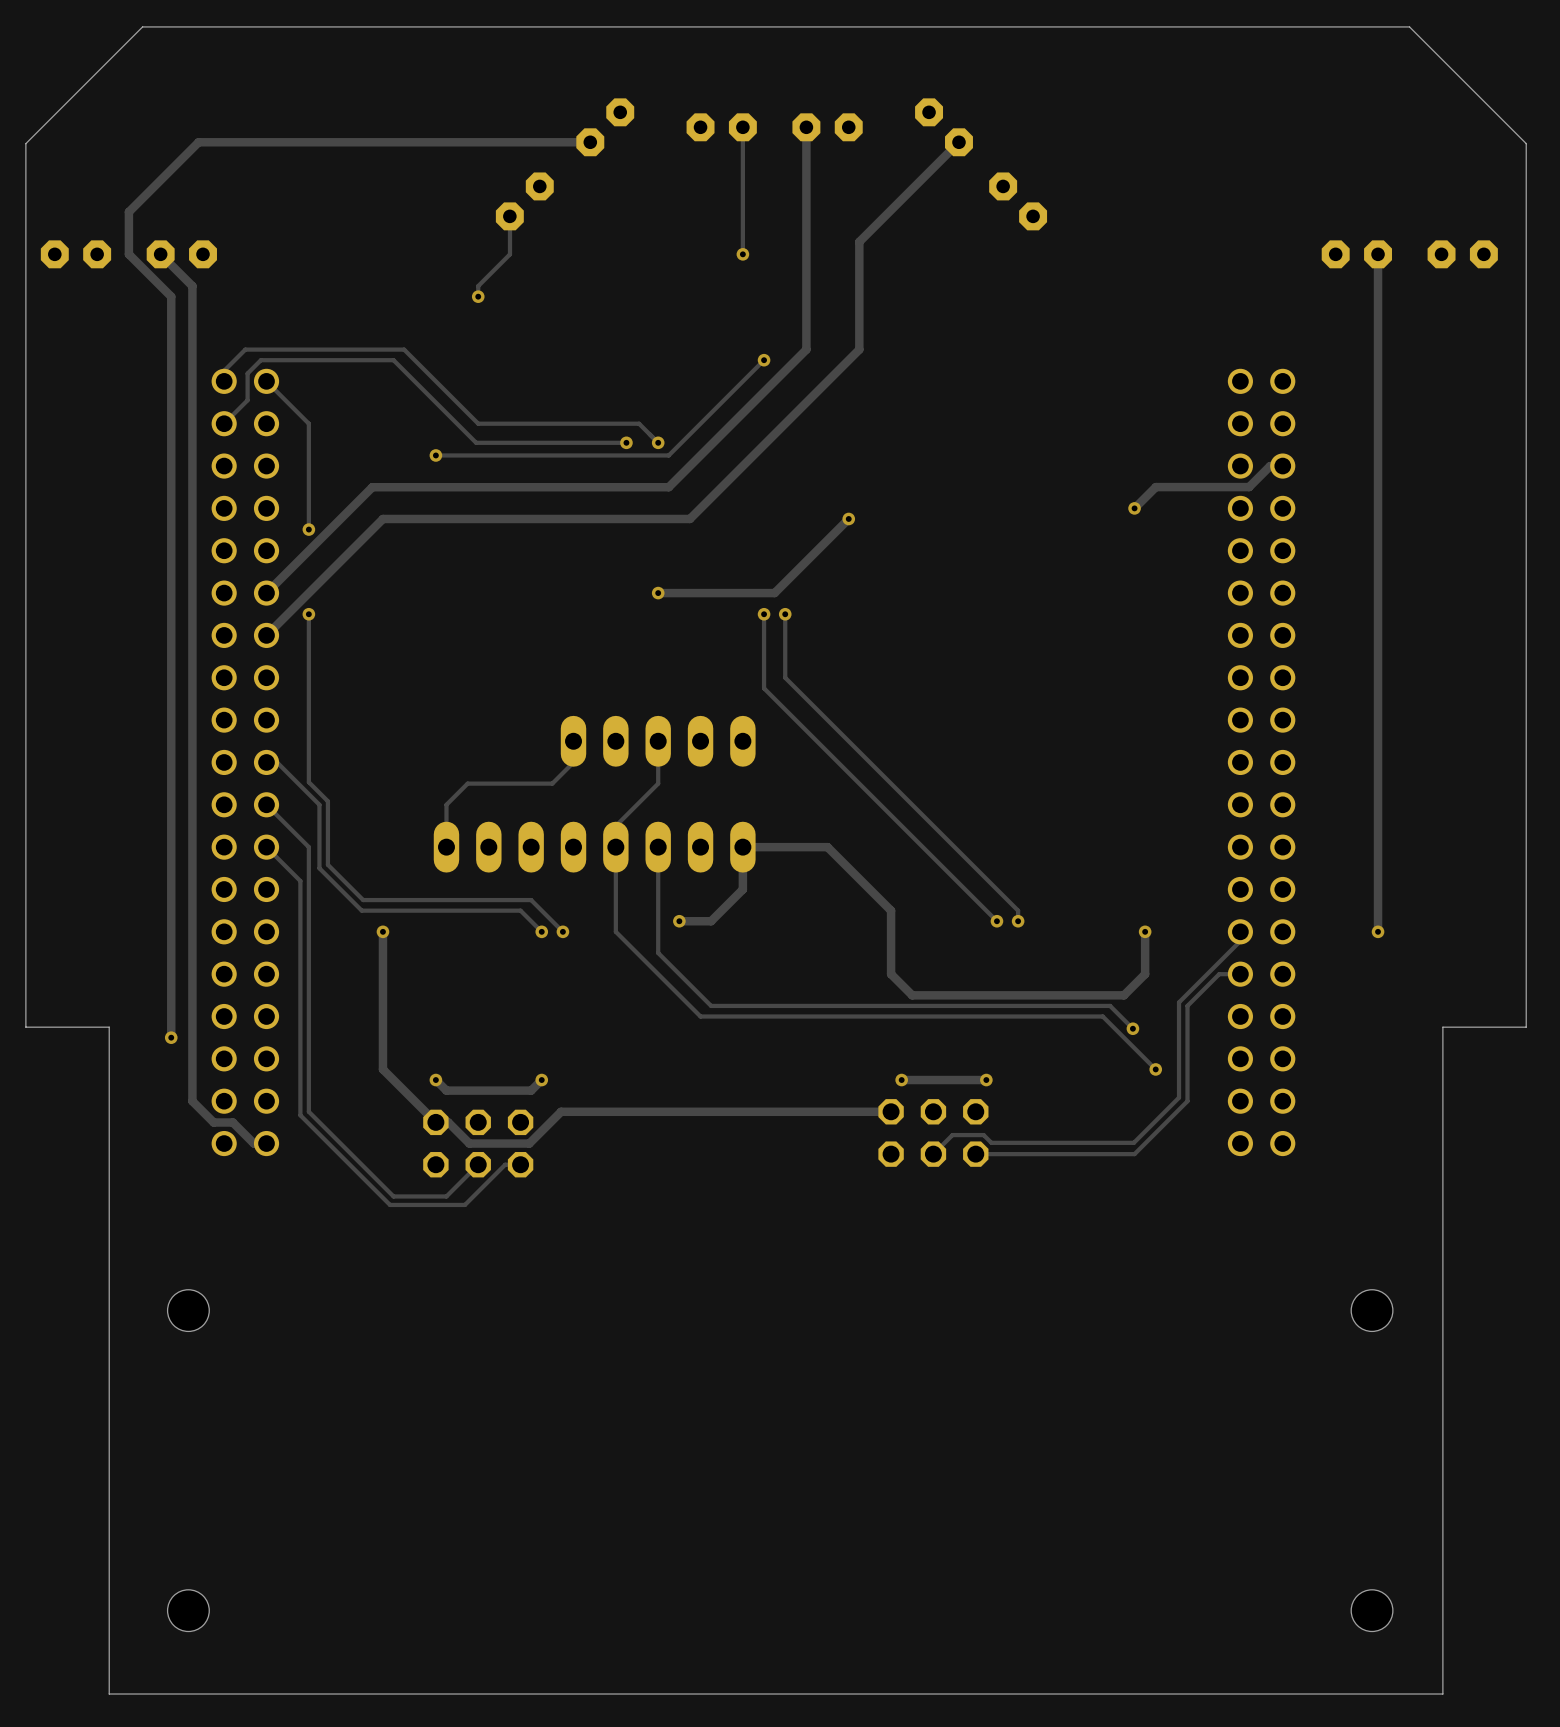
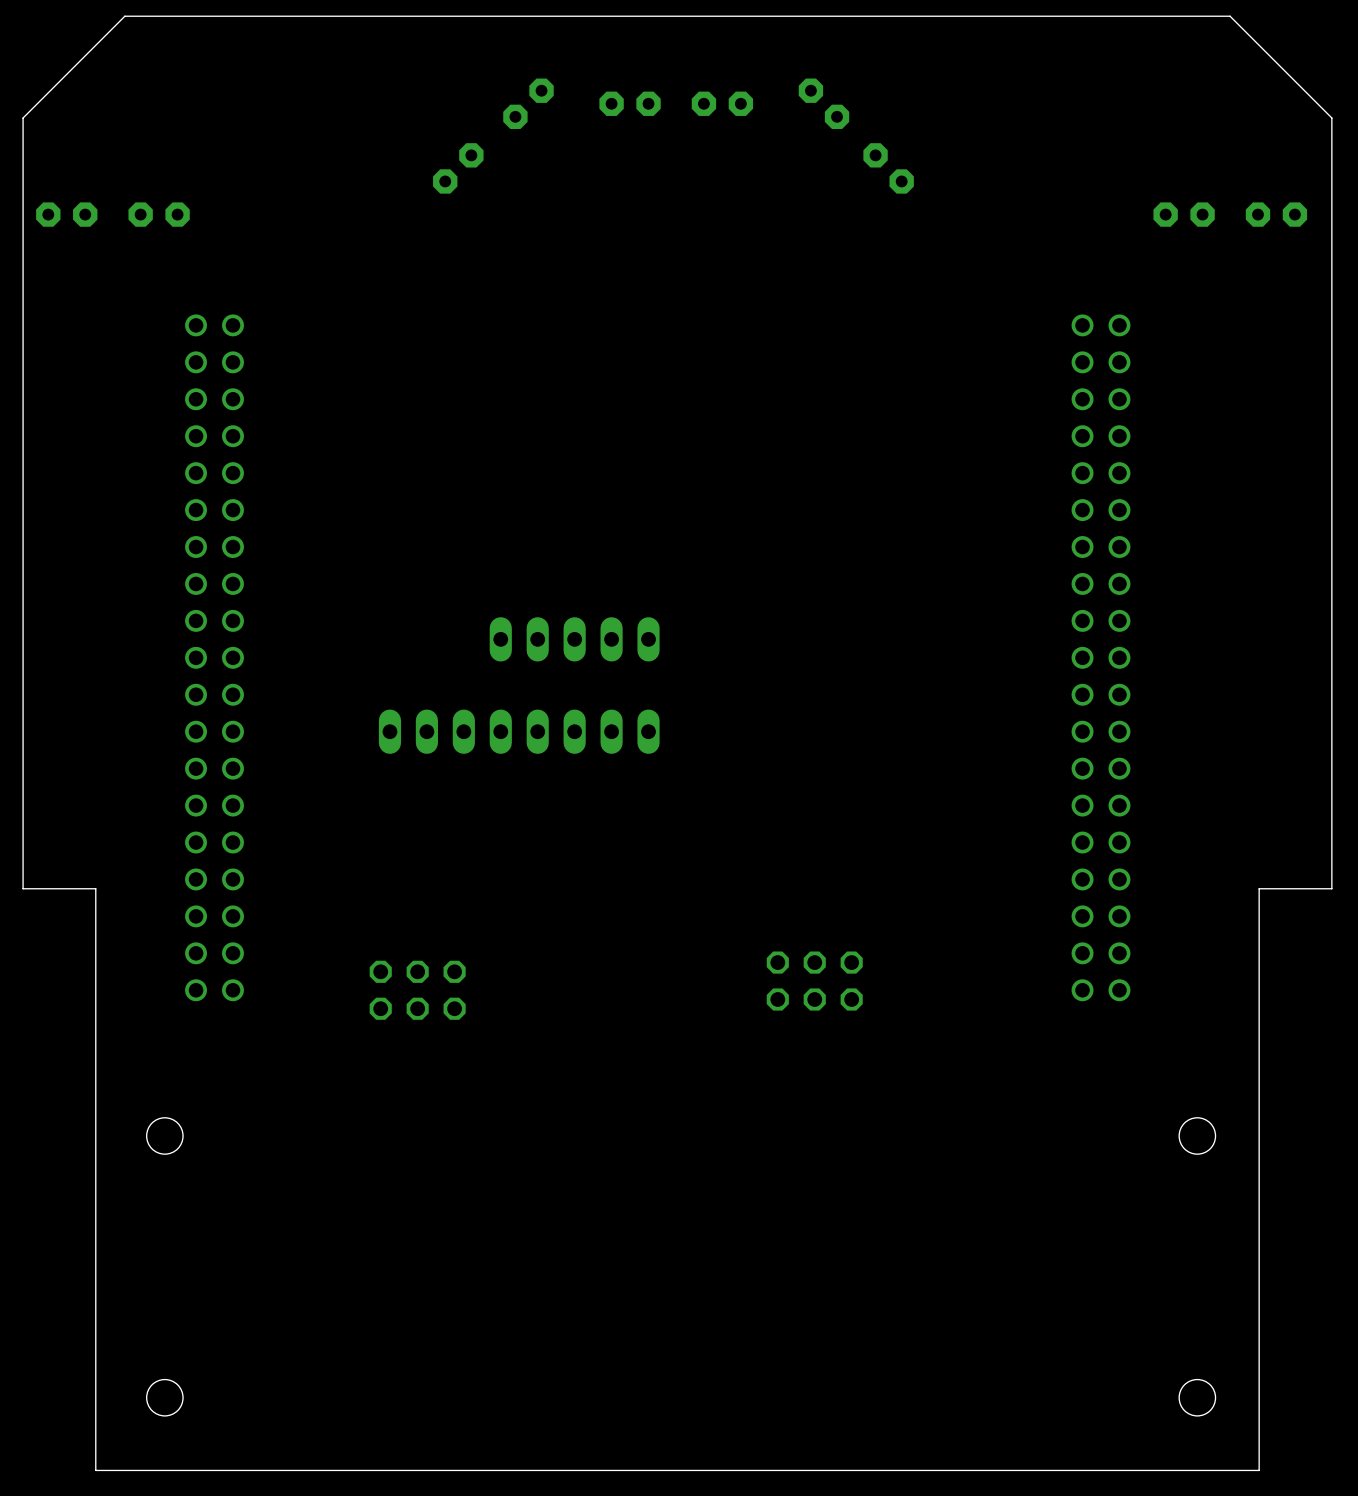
track: (742, 127) (742, 254) -> none
track: (806, 127) (806, 349) (668, 487) (372, 487) (266, 593) -> none
track: (590, 142) (198, 142) (128, 211) (128, 254) (171, 296) (171, 1037) -> none
track: (958, 142) (859, 241) (859, 349) (689, 518) (382, 518) (266, 635) -> none
track: (510, 216) (510, 254) (478, 286) (478, 296) -> none
track: (160, 254) (192, 286) (192, 1101) (213, 1122) (232, 1122) (253, 1143) (266, 1143) -> none
via: (742, 254) -> none
track: (1378, 254) (1378, 931) -> none
via: (478, 296) -> none
track: (764, 360) (668, 455) (435, 455) -> none
via: (764, 360) -> none
track: (224, 381) (224, 370) (245, 349) (404, 349) (478, 423) (639, 423) (658, 442) -> none
track: (266, 381) (308, 423) (308, 529) -> none
track: (224, 423) (247, 400) (247, 373) (260, 360) (393, 360) (476, 442) (626, 442) -> none
via: (626, 442) -> none
via: (658, 442) -> none
via: (435, 455) -> none
track: (1282, 466) (1270, 466) (1249, 487) (1155, 487) (1134, 508) -> none
via: (1134, 508) -> none
track: (848, 518) (774, 593) (658, 593) -> none
via: (848, 518) -> none
via: (308, 529) -> none
via: (658, 593) -> none
track: (308, 614) (308, 782) (327, 801) (327, 864) (363, 900) (531, 900) (562, 931) -> none
via: (308, 614) -> none
track: (764, 614) (764, 688) (996, 921) -> none
via: (764, 614) -> none
track: (785, 614) (785, 677) (1018, 910) (1018, 921) -> none
via: (785, 614) -> none
track: (573, 741) (573, 762) (552, 783) (467, 783) (446, 804) (446, 847) -> none
track: (658, 741) (658, 783) (615, 825) (615, 931) (700, 1016) (1102, 1016) (1155, 1069) -> none
track: (266, 762) (277, 762) (319, 804) (319, 868) (361, 910) (520, 910) (541, 931) -> none
track: (266, 804) (308, 847) (308, 1111) (393, 1196) (446, 1196) (478, 1164) -> none
track: (266, 847) (300, 881) (300, 1115) (390, 1204) (464, 1204) (505, 1164) (520, 1164) -> none
track: (658, 847) (658, 953) (711, 1005) (1110, 1005) (1132, 1028) -> none
track: (679, 921) (711, 921) (742, 889) (742, 847) (827, 847) (891, 910) (891, 974) (912, 995) (1123, 995) (1145, 974) (1145, 931) -> none
via: (679, 921) -> none
via: (996, 921) -> none
via: (1018, 921) -> none
track: (382, 931) (382, 1069) (435, 1122) (448, 1122) (469, 1143) (529, 1143) (561, 1111) (891, 1111) -> none
via: (382, 931) -> none
via: (541, 931) -> none
via: (562, 931) -> none
via: (1145, 931) -> none
track: (1240, 931) (1240, 941) (1179, 1002) (1179, 1097) (1133, 1142) (991, 1142) (983, 1135) (952, 1135) (933, 1154) -> none
via: (1378, 931) -> none
track: (1240, 974) (1219, 974) (1187, 1005) (1187, 1101) (1134, 1154) (975, 1154) -> none
via: (1132, 1028) -> none
via: (171, 1037) -> none
via: (1155, 1069) -> none
via: (435, 1080) -> none
track: (541, 1080) (531, 1090) (446, 1090) (435, 1080) -> none
via: (541, 1080) -> none
via: (901, 1080) -> none
track: (986, 1080) (901, 1080) -> none
via: (986, 1080) -> none

